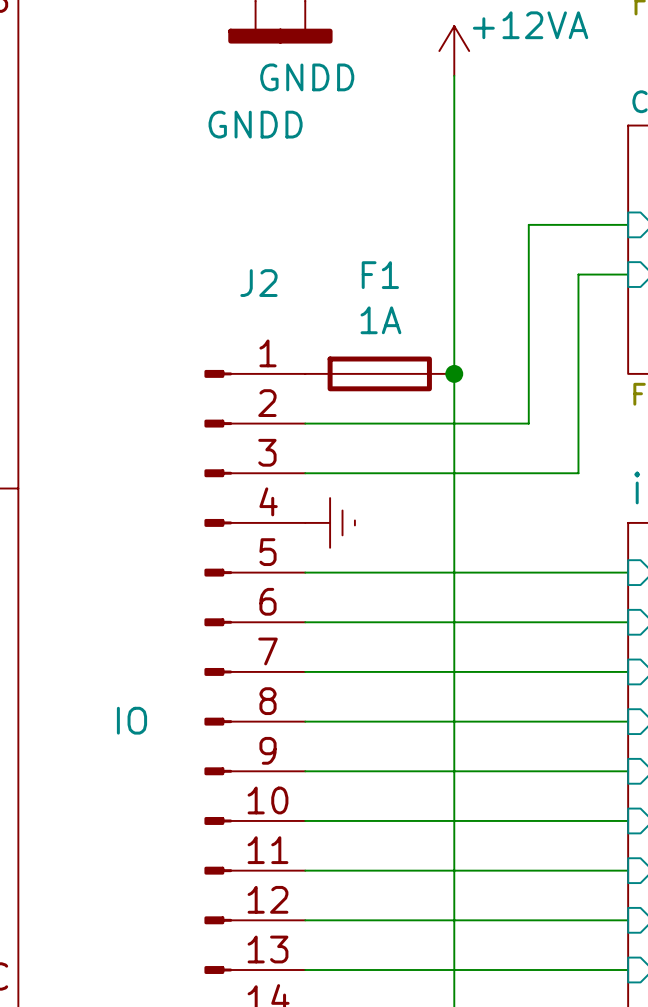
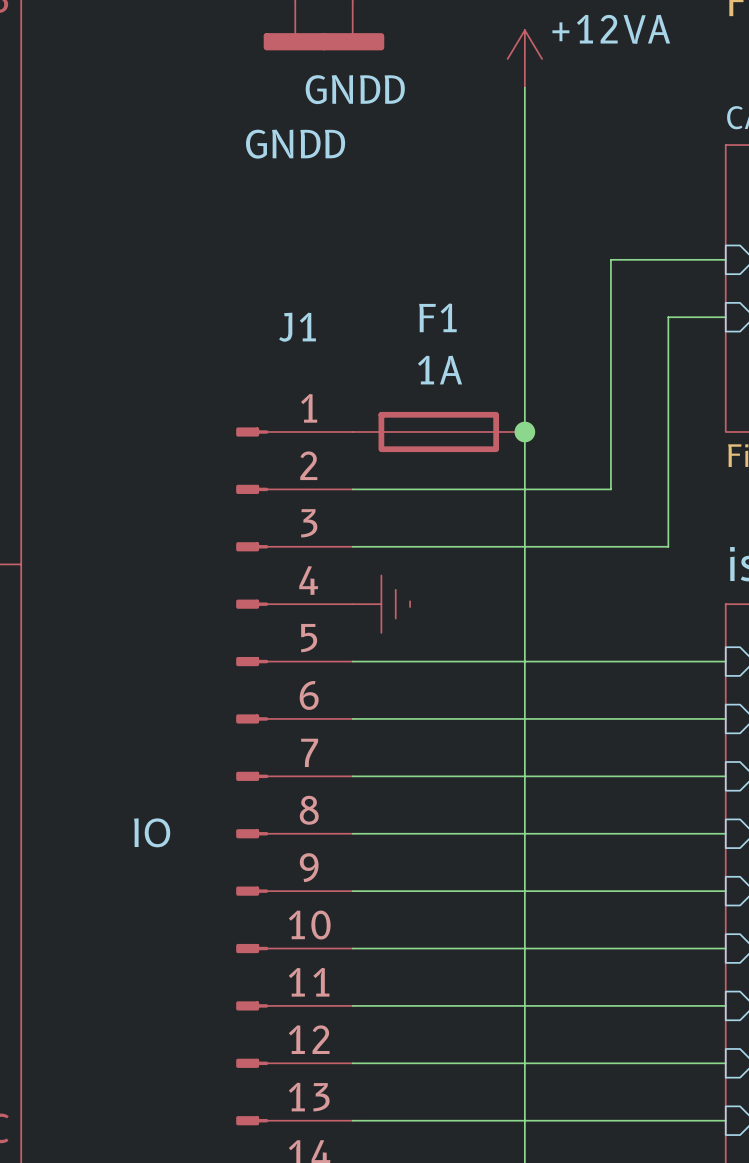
J2 name: J2 (258, 283) -> J1 (297, 327)

